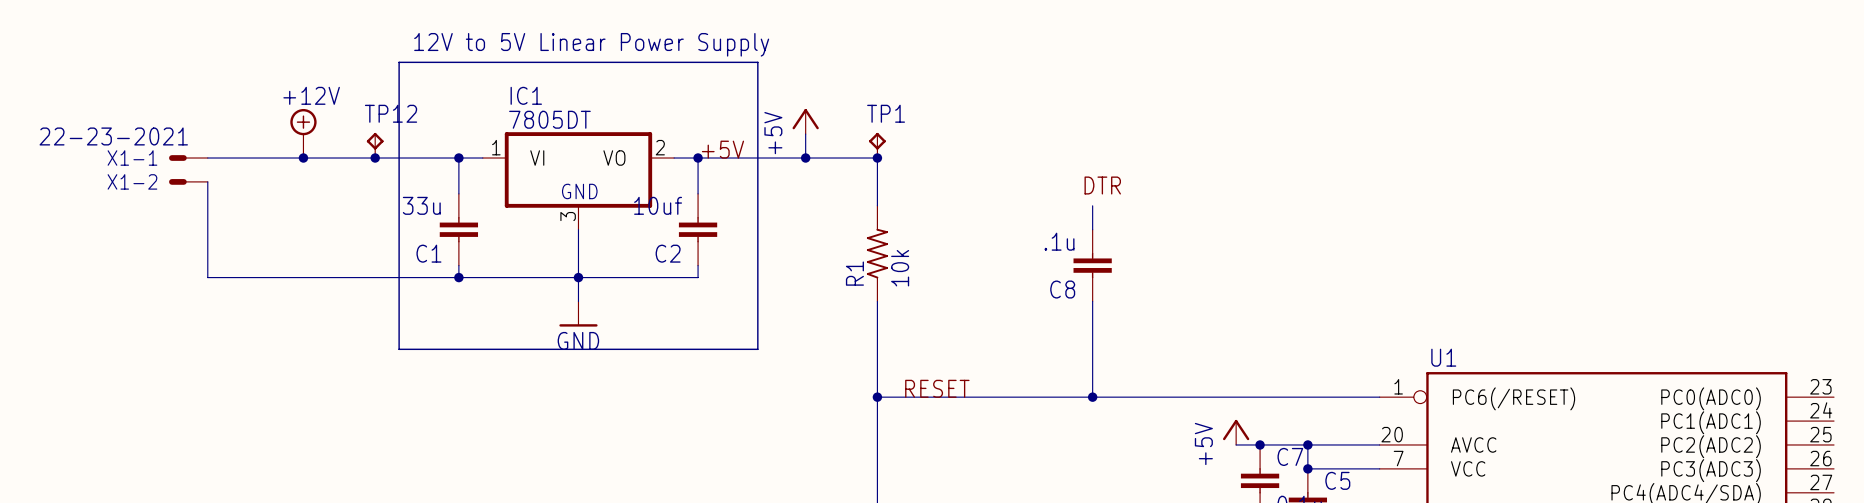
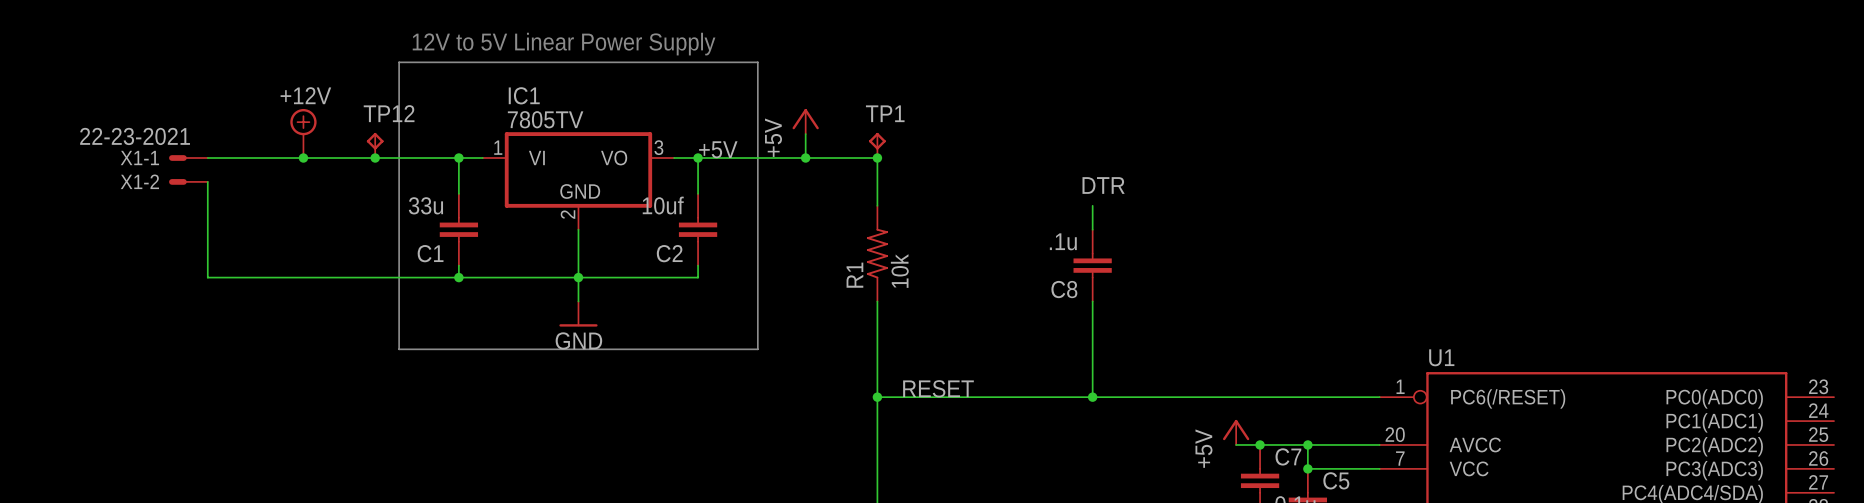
IC1 value: 7805DT (549, 119) -> 7805TV (545, 119)
IC1 pin number: 2 (660, 147) -> 3 (658, 147)
IC1 pin number: 3 (568, 216) -> 2 (568, 214)

